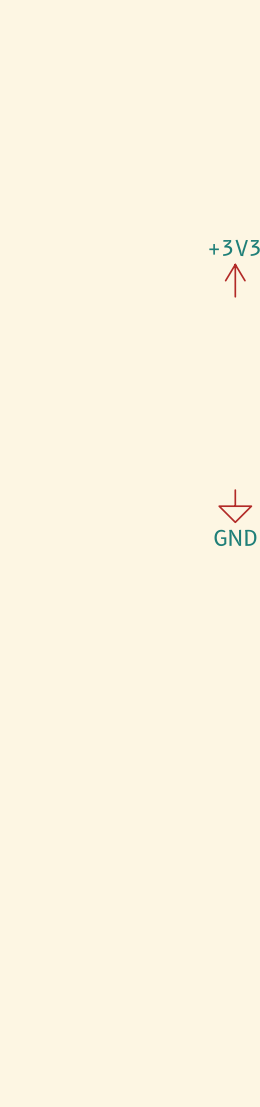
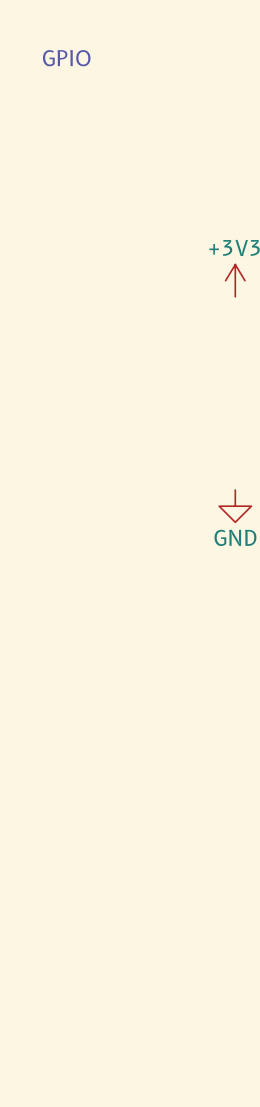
text: none -> GPIO (66, 58)

